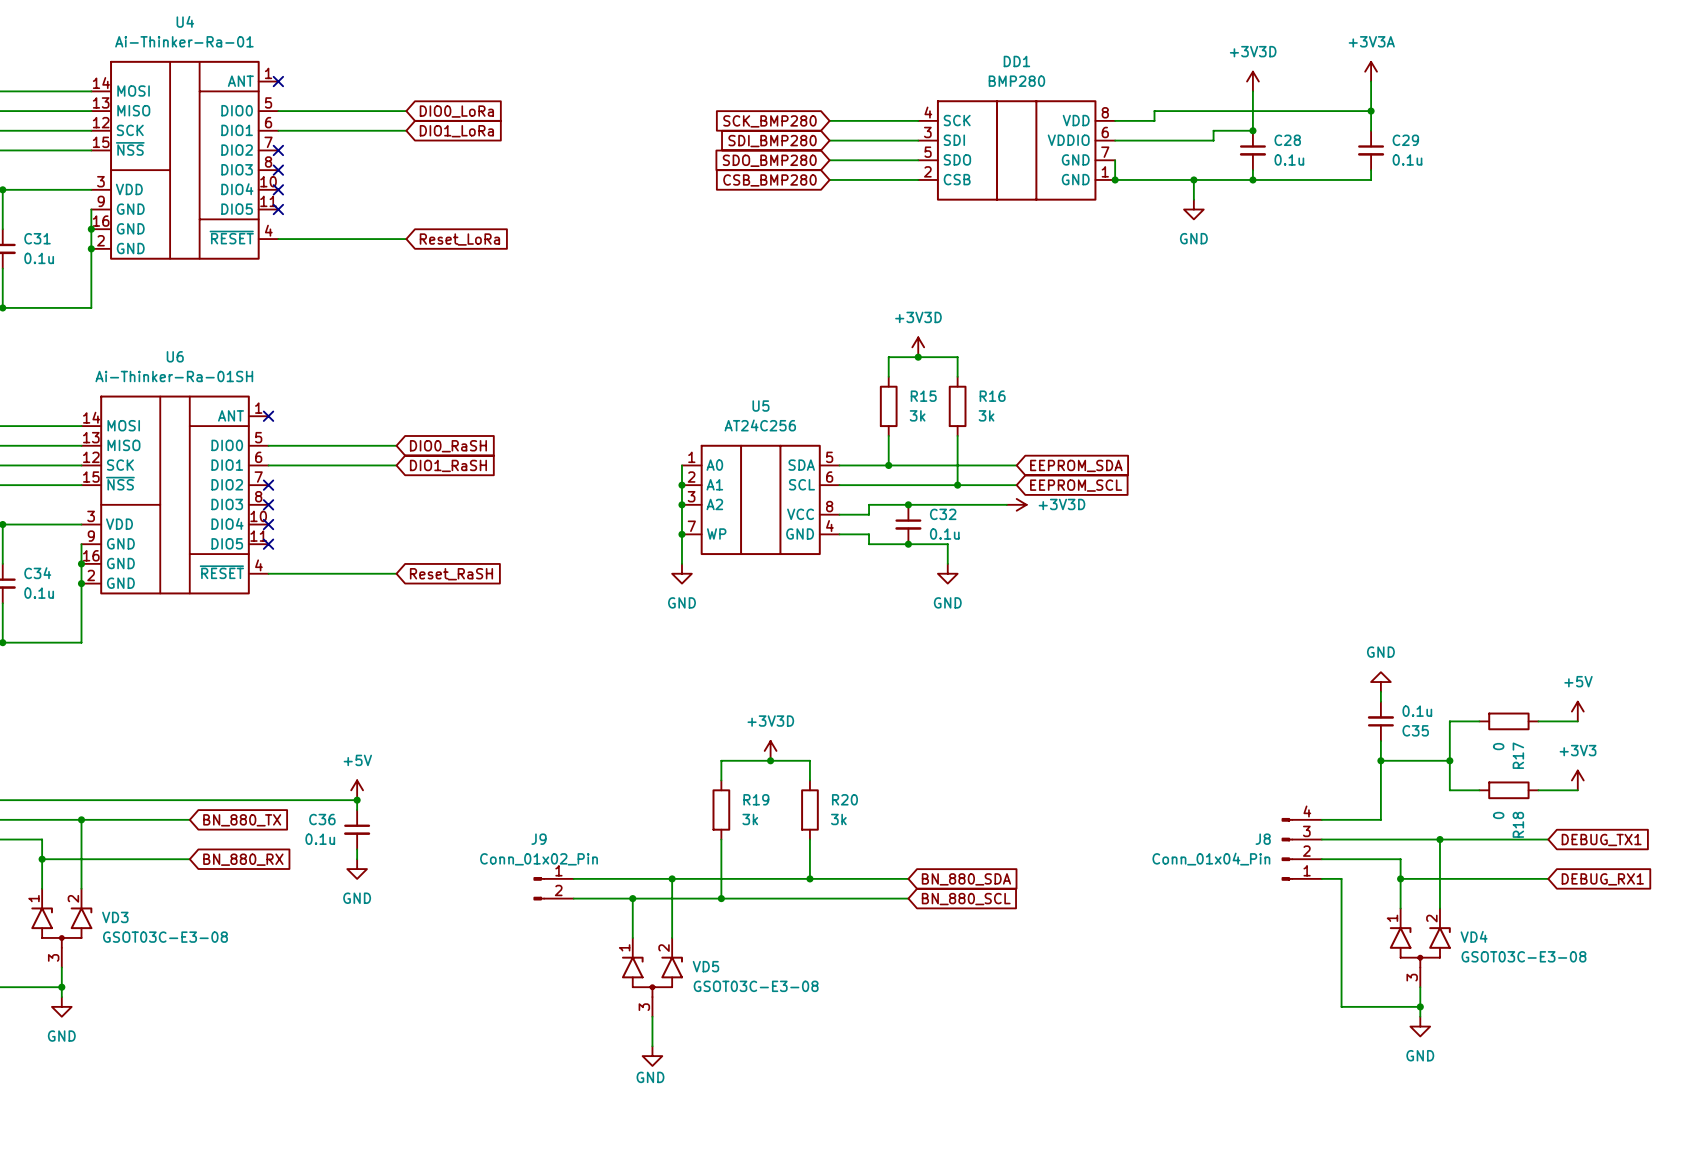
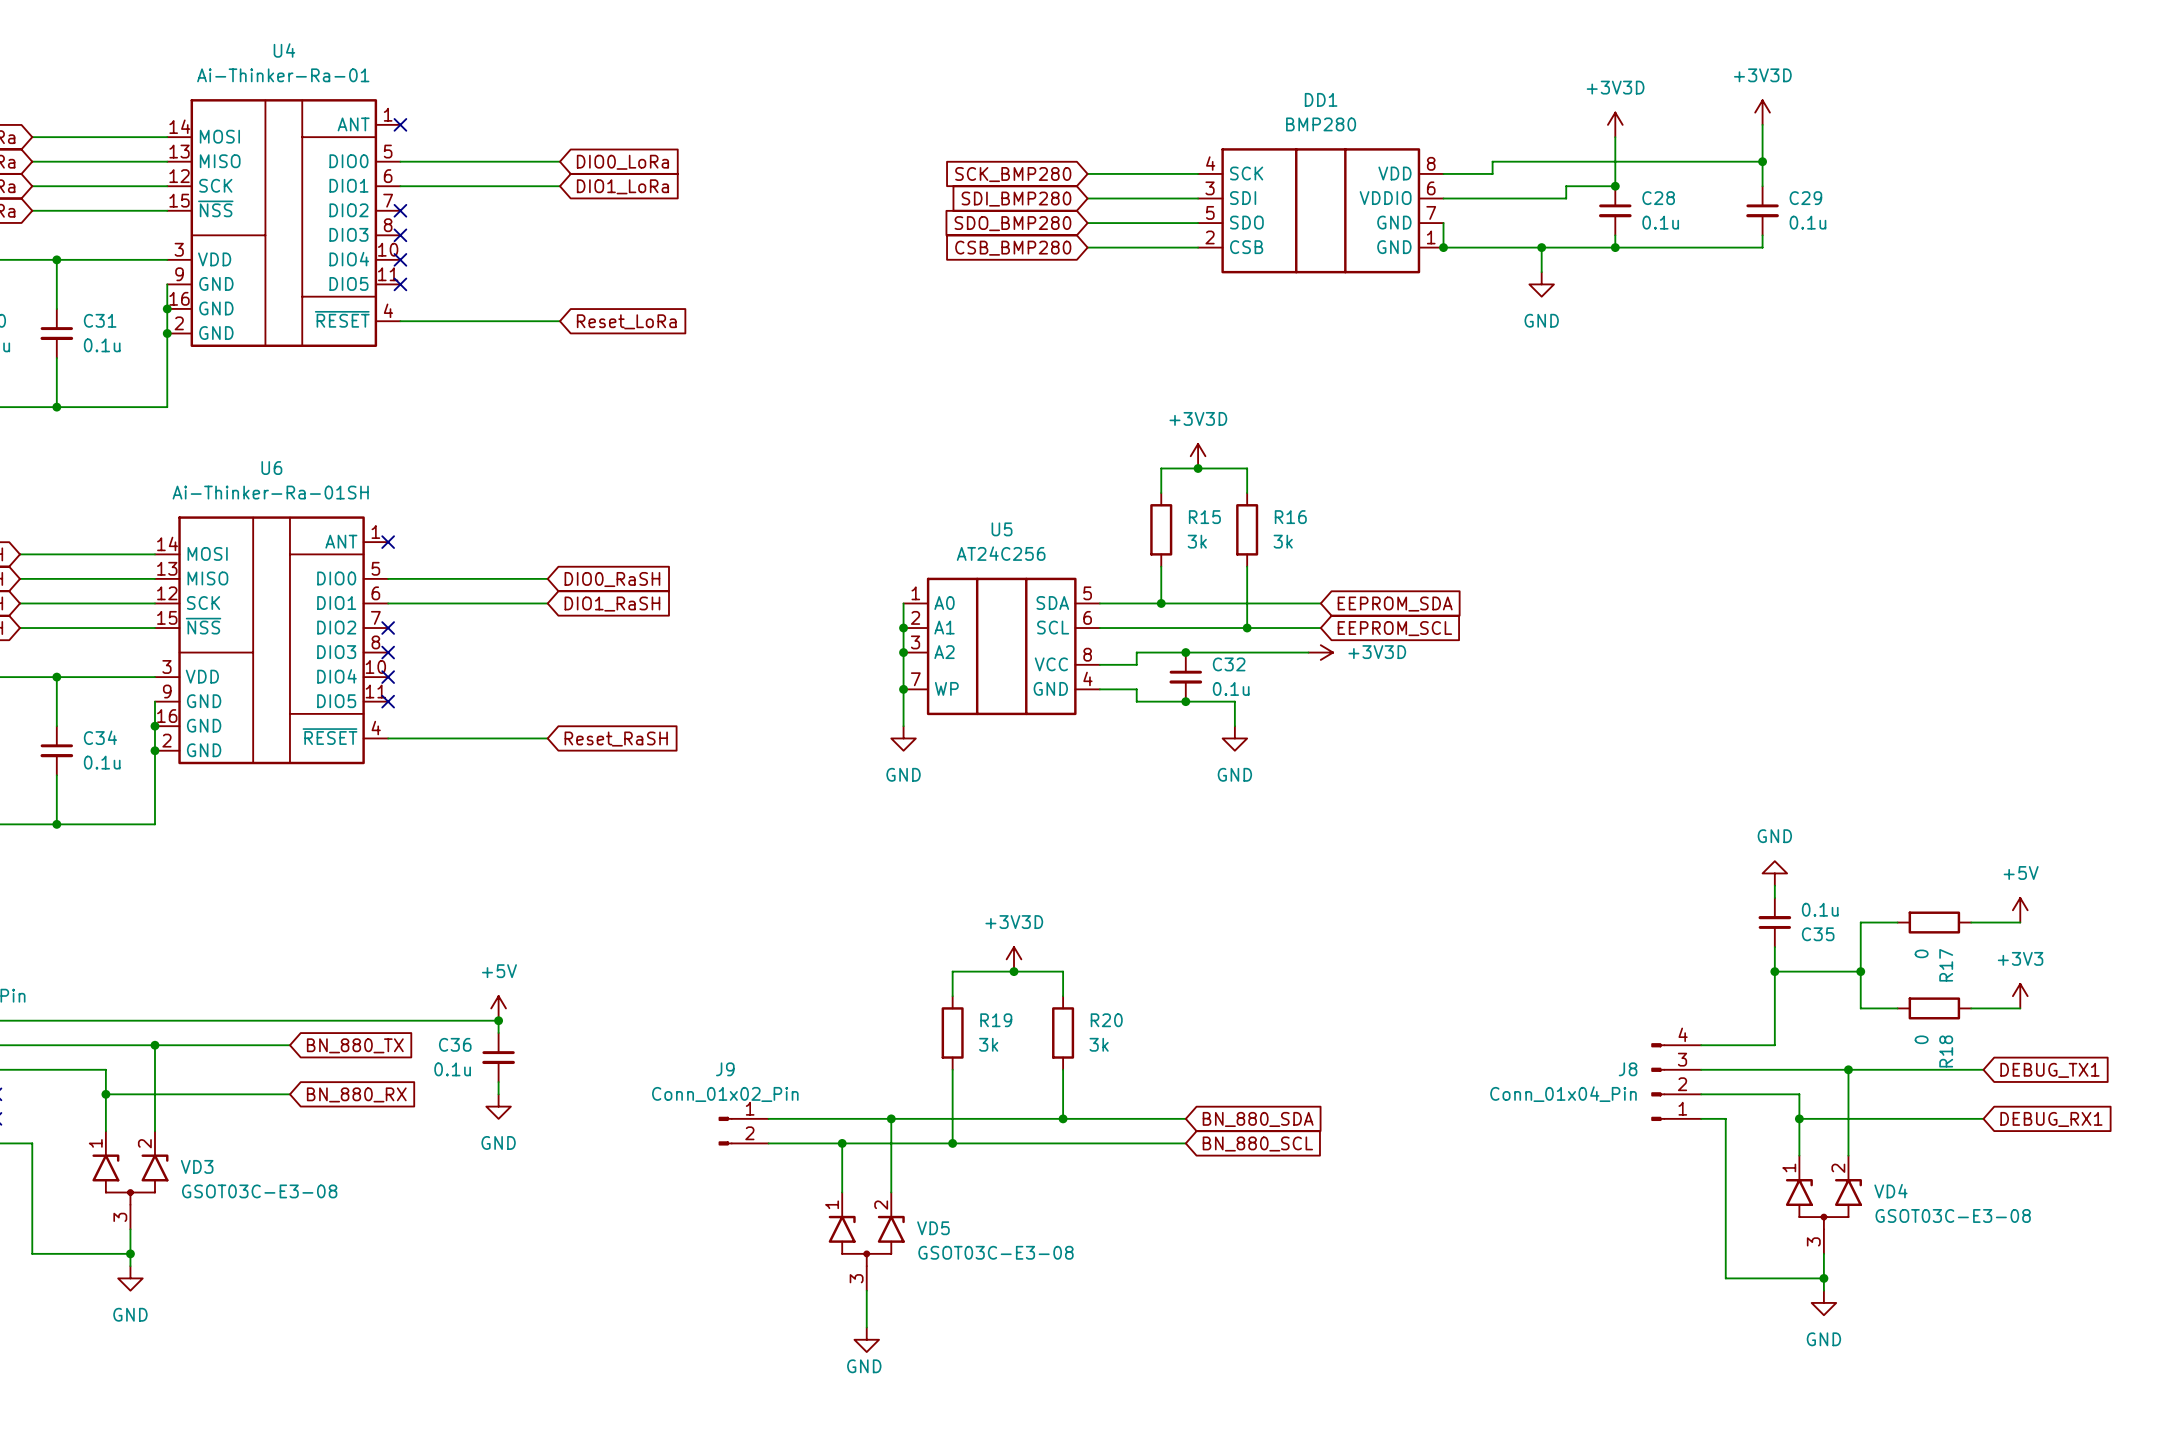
power symbol: +3V3A (1371, 71) -> +3V3D (1762, 112)

